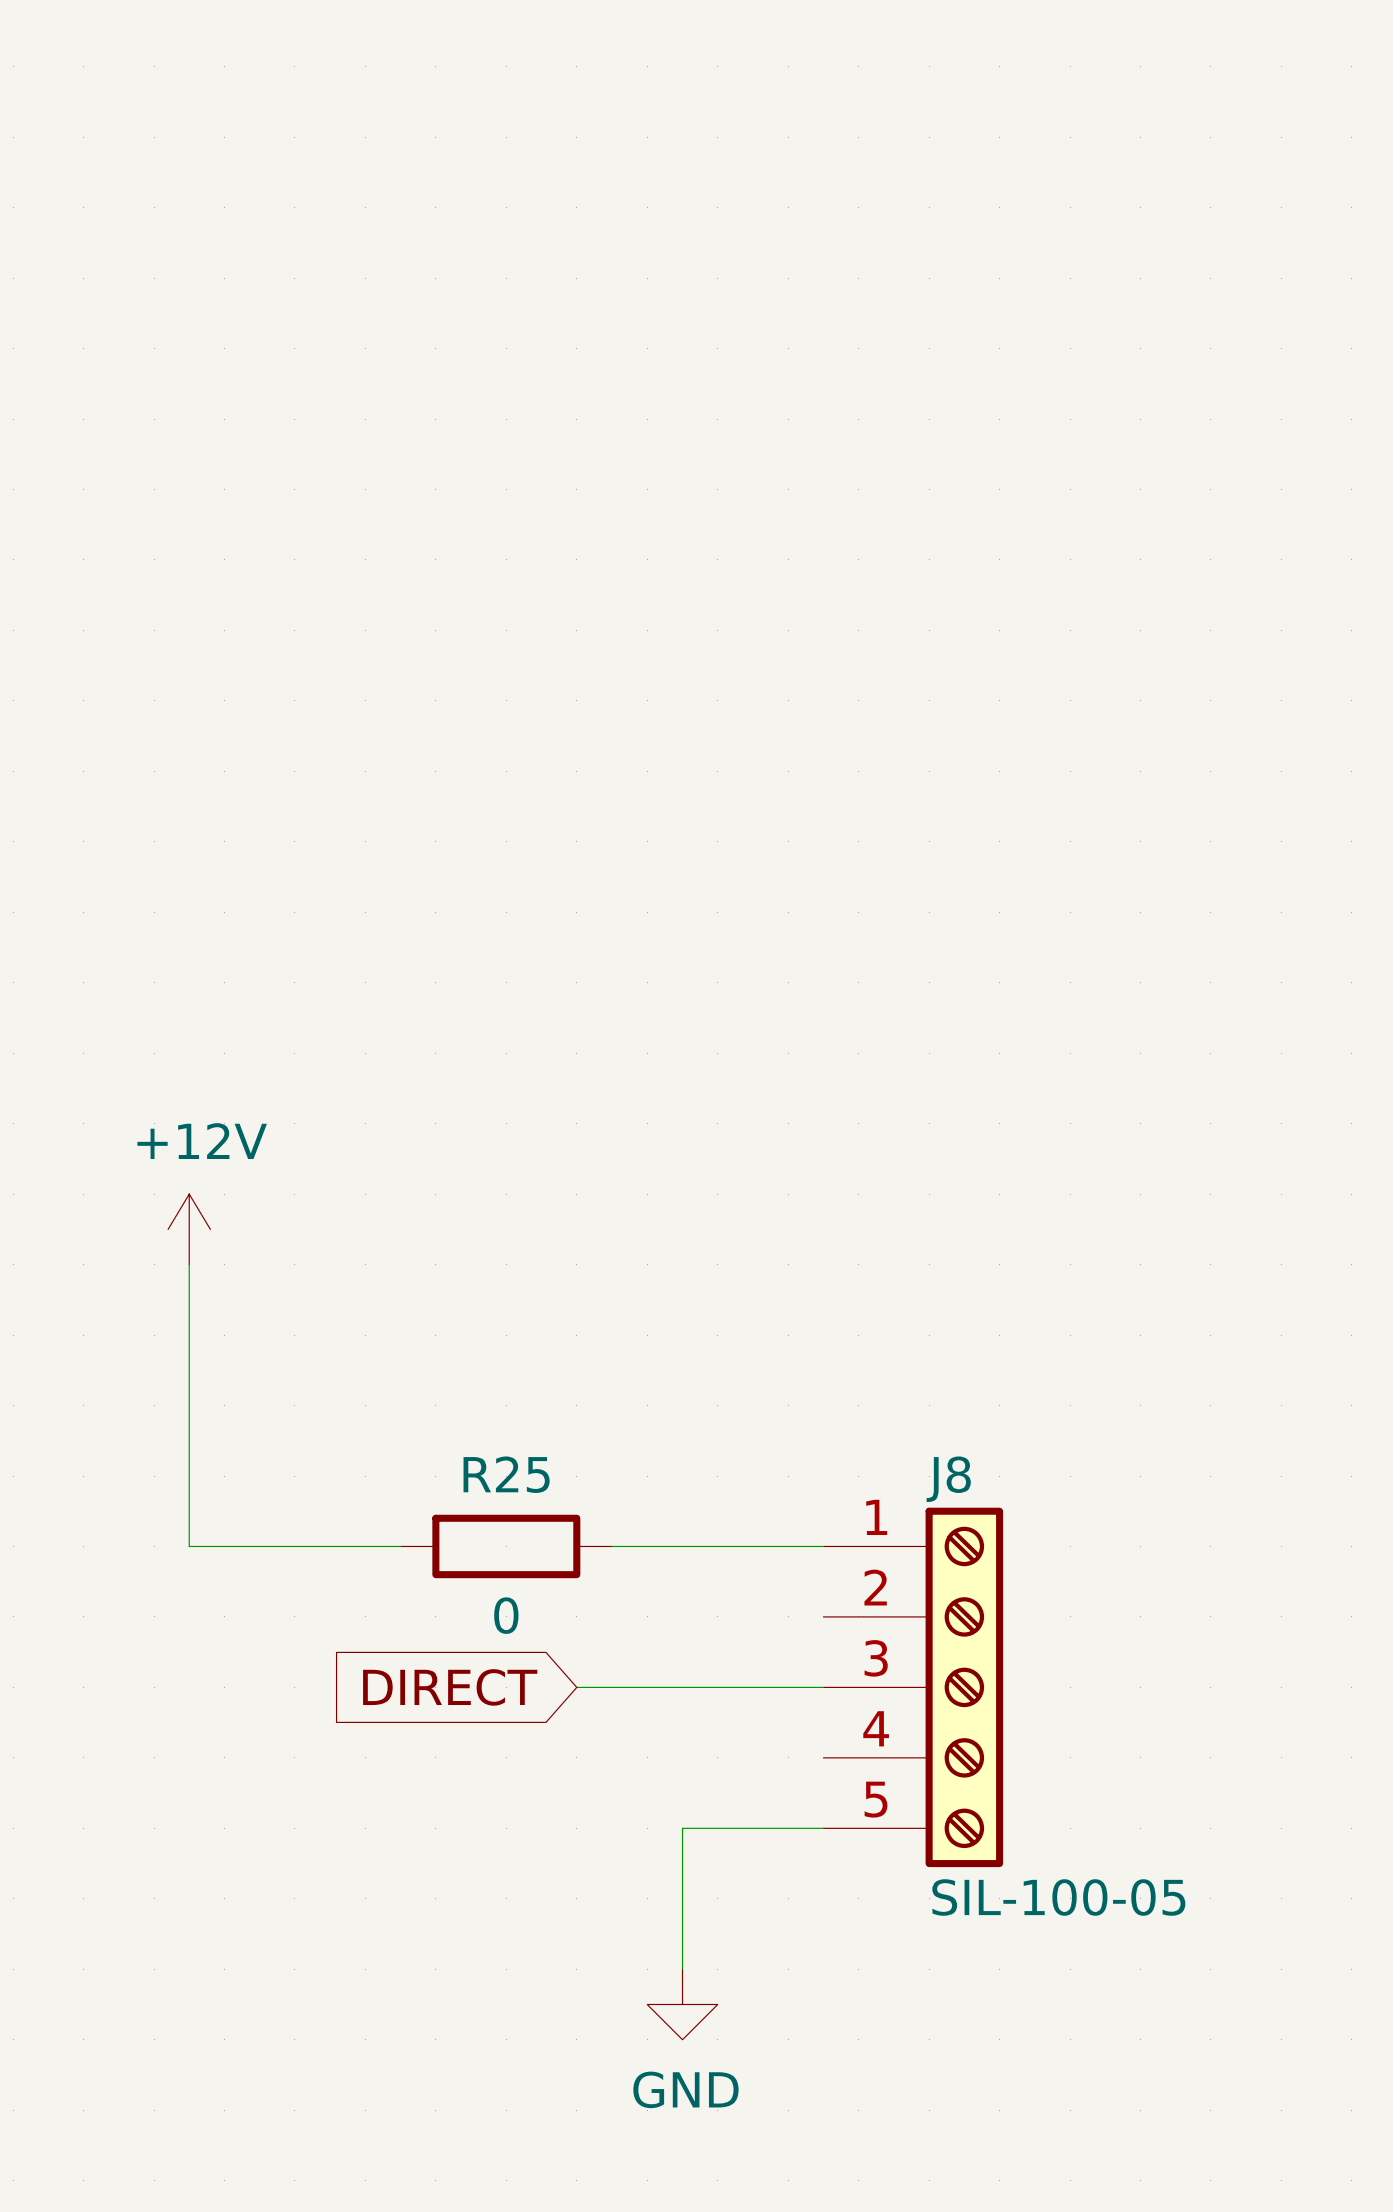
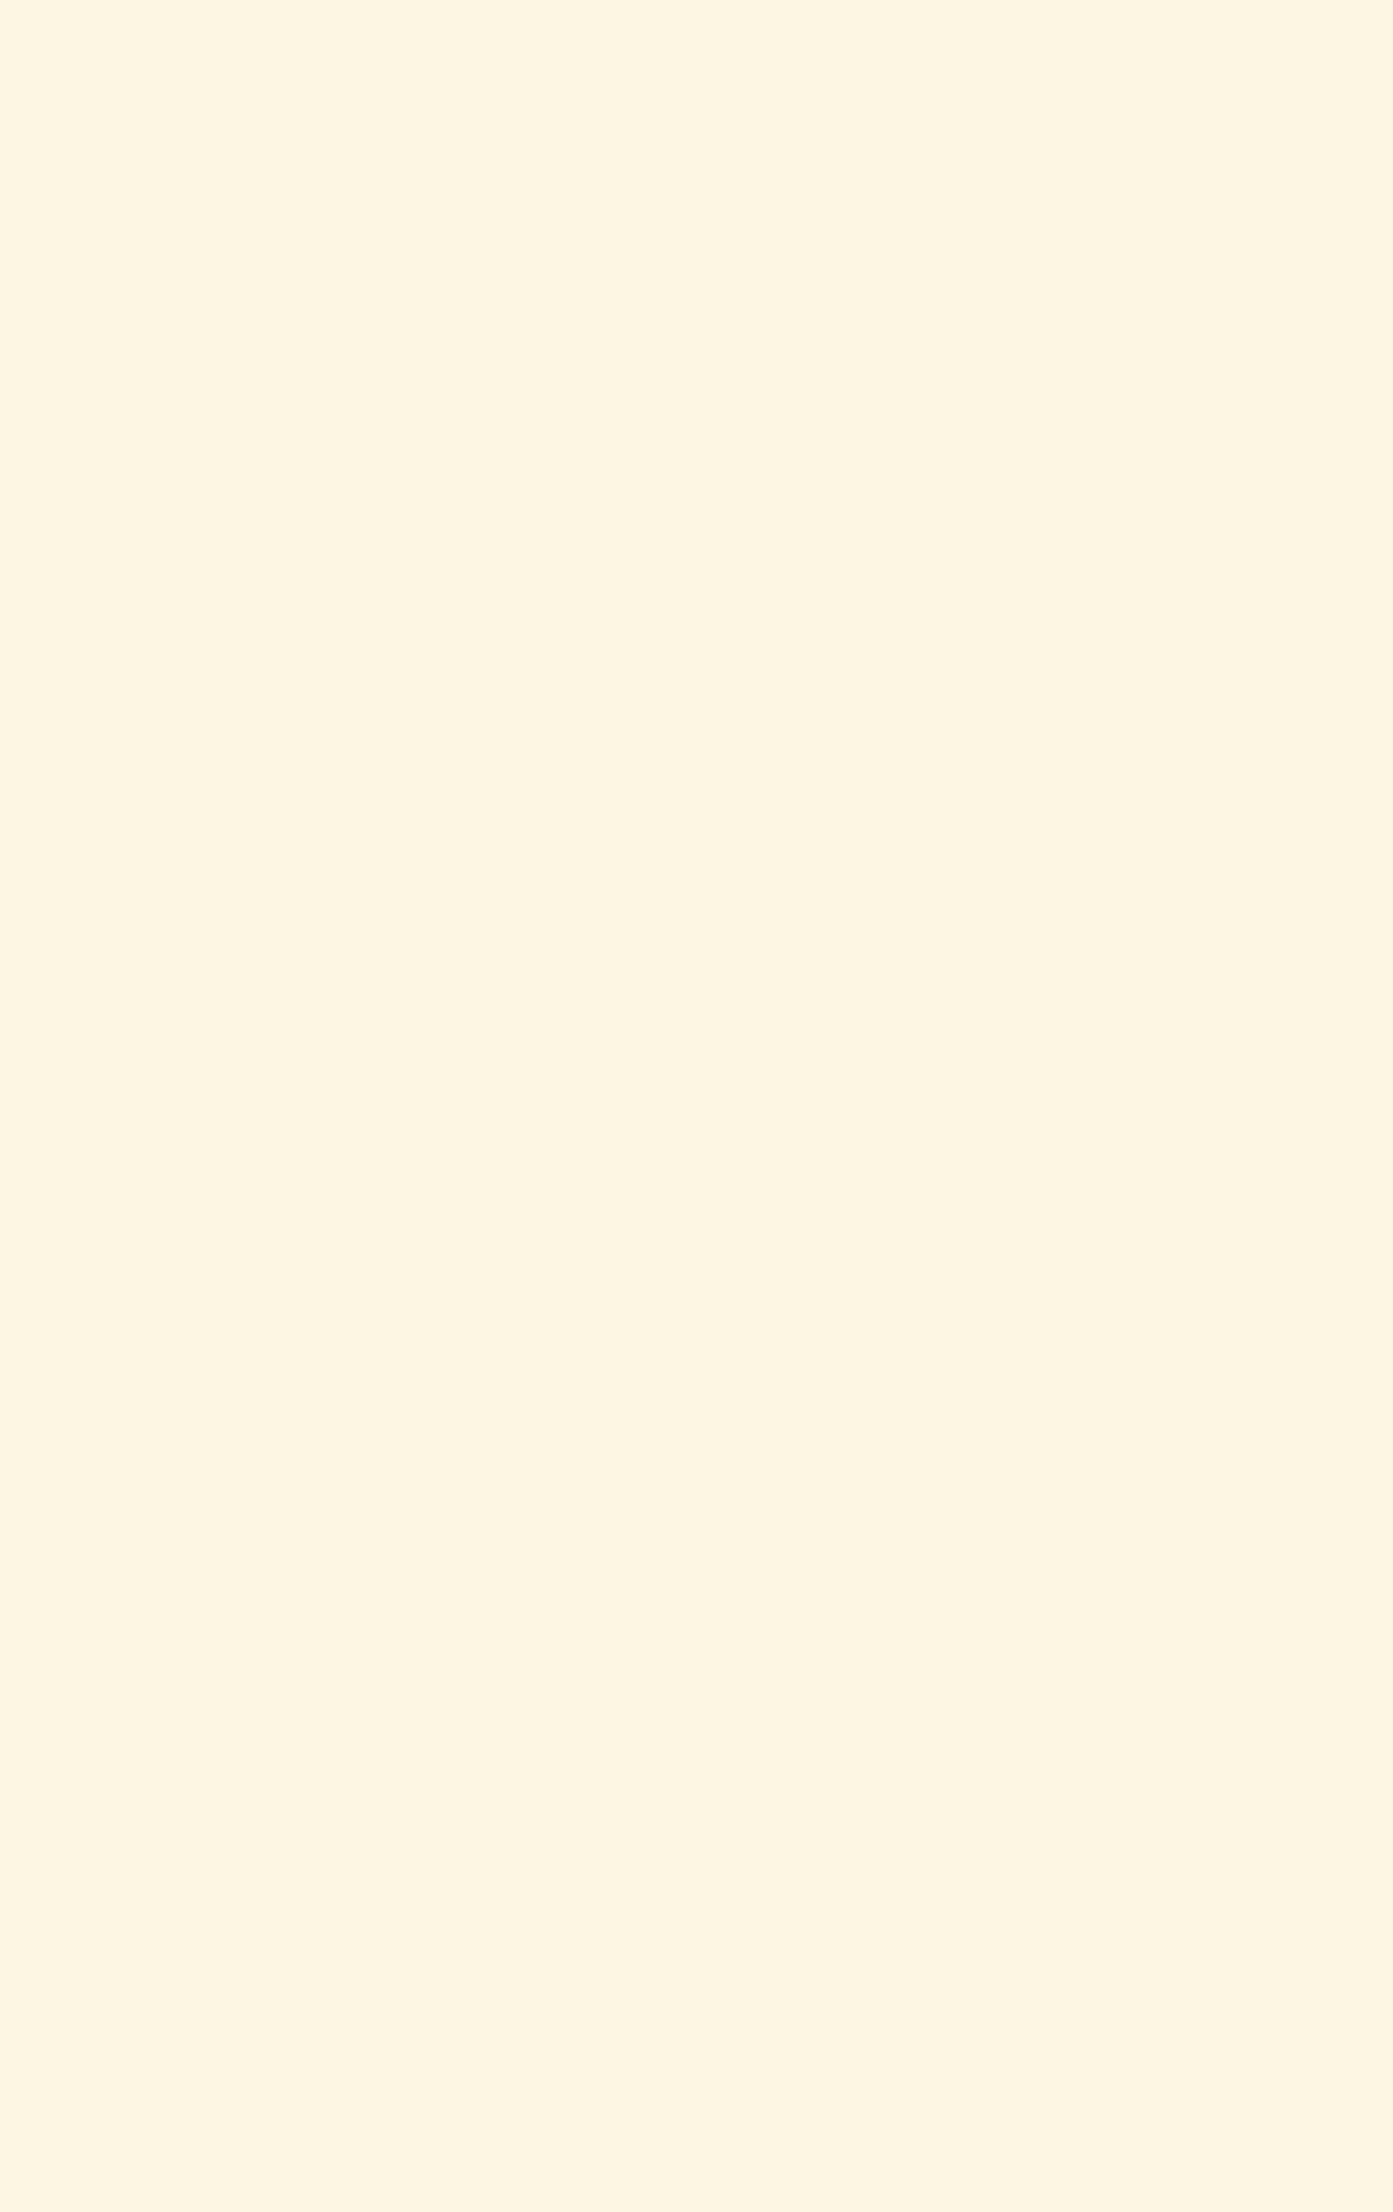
power symbol: +12V (189, 1229) -> none
wire: (189, 1264) (189, 1546) (400, 1546) -> none
R25: 0 (506, 1546) -> none
wire: (612, 1546) (823, 1546) -> none
global label: DIRECT (450, 1687) -> none
wire: (576, 1687) (823, 1687) -> none
J8: SIL-100-05 (913, 1687) -> none
wire: (823, 1828) (682, 1828) (682, 1969) -> none
power symbol: GND (682, 2004) -> none

